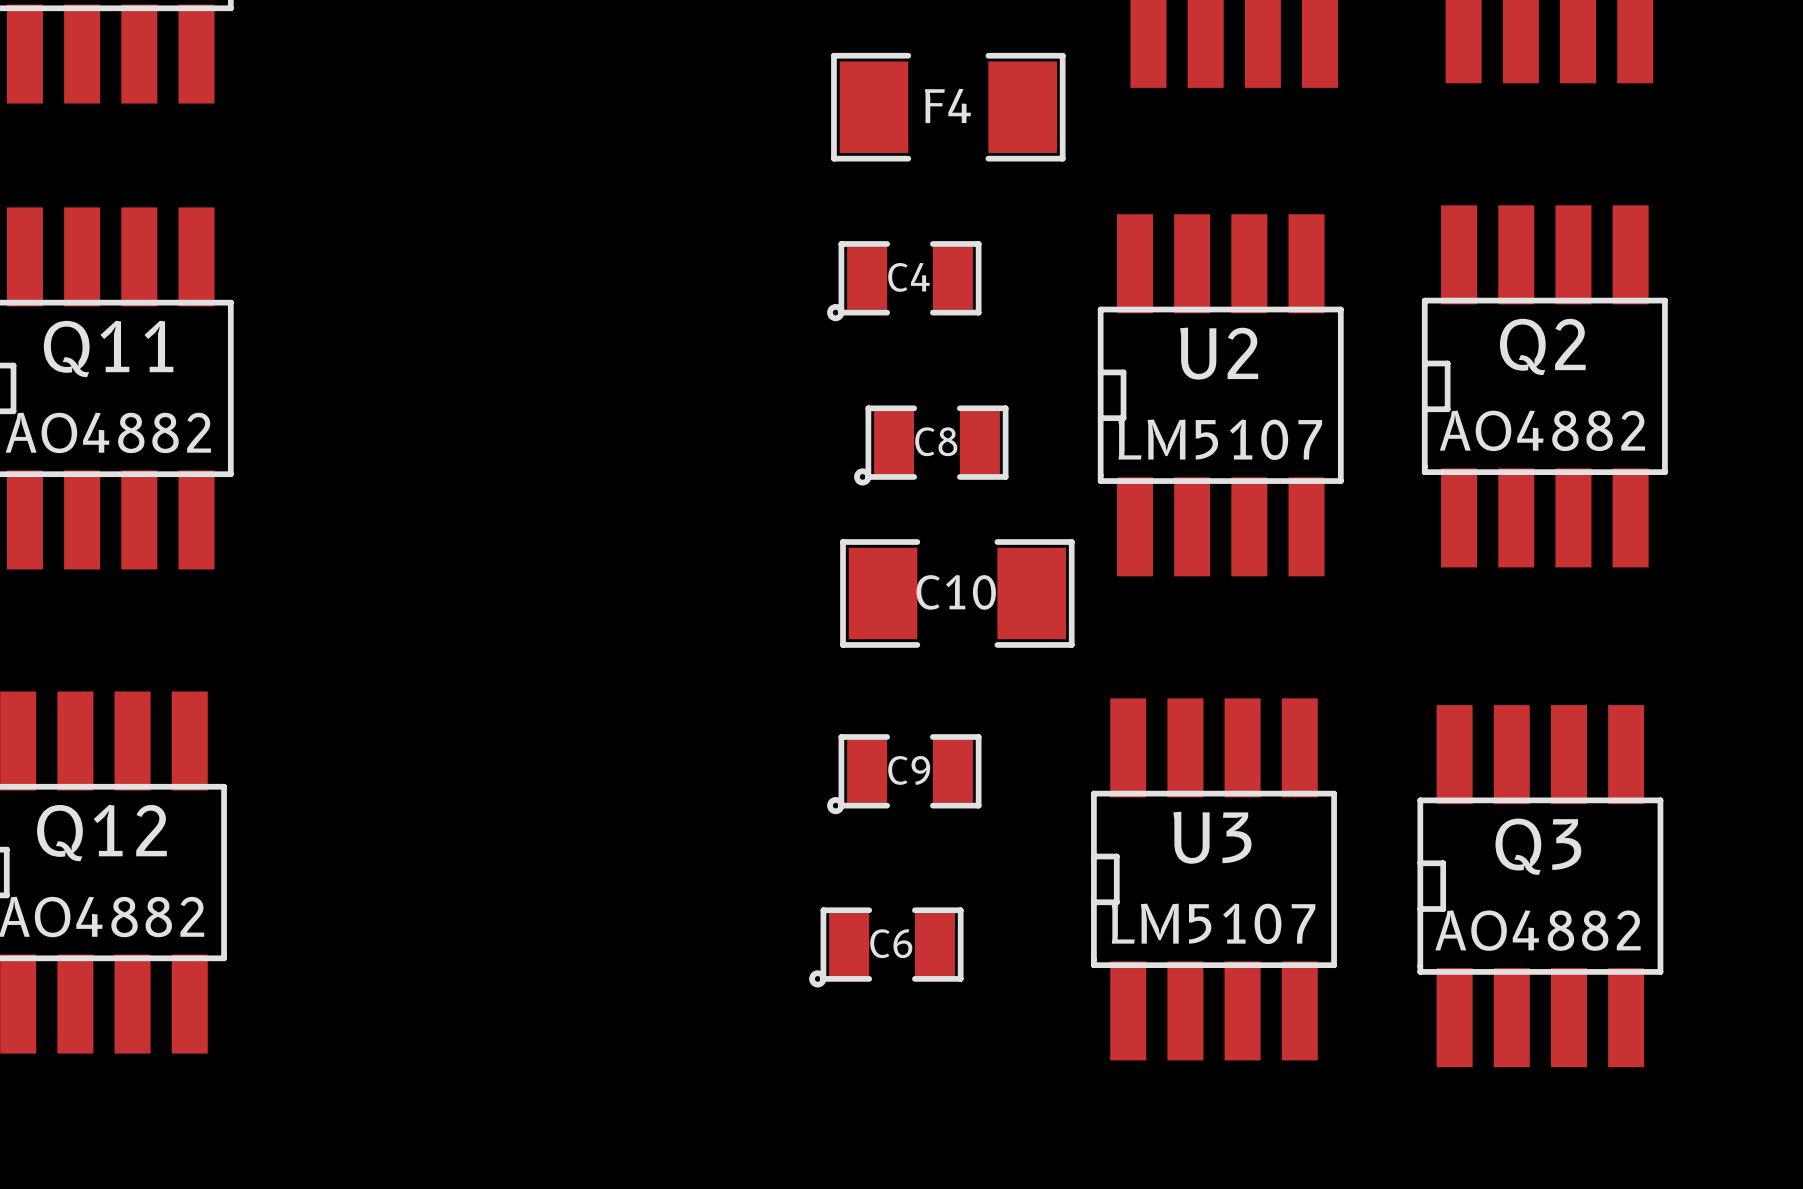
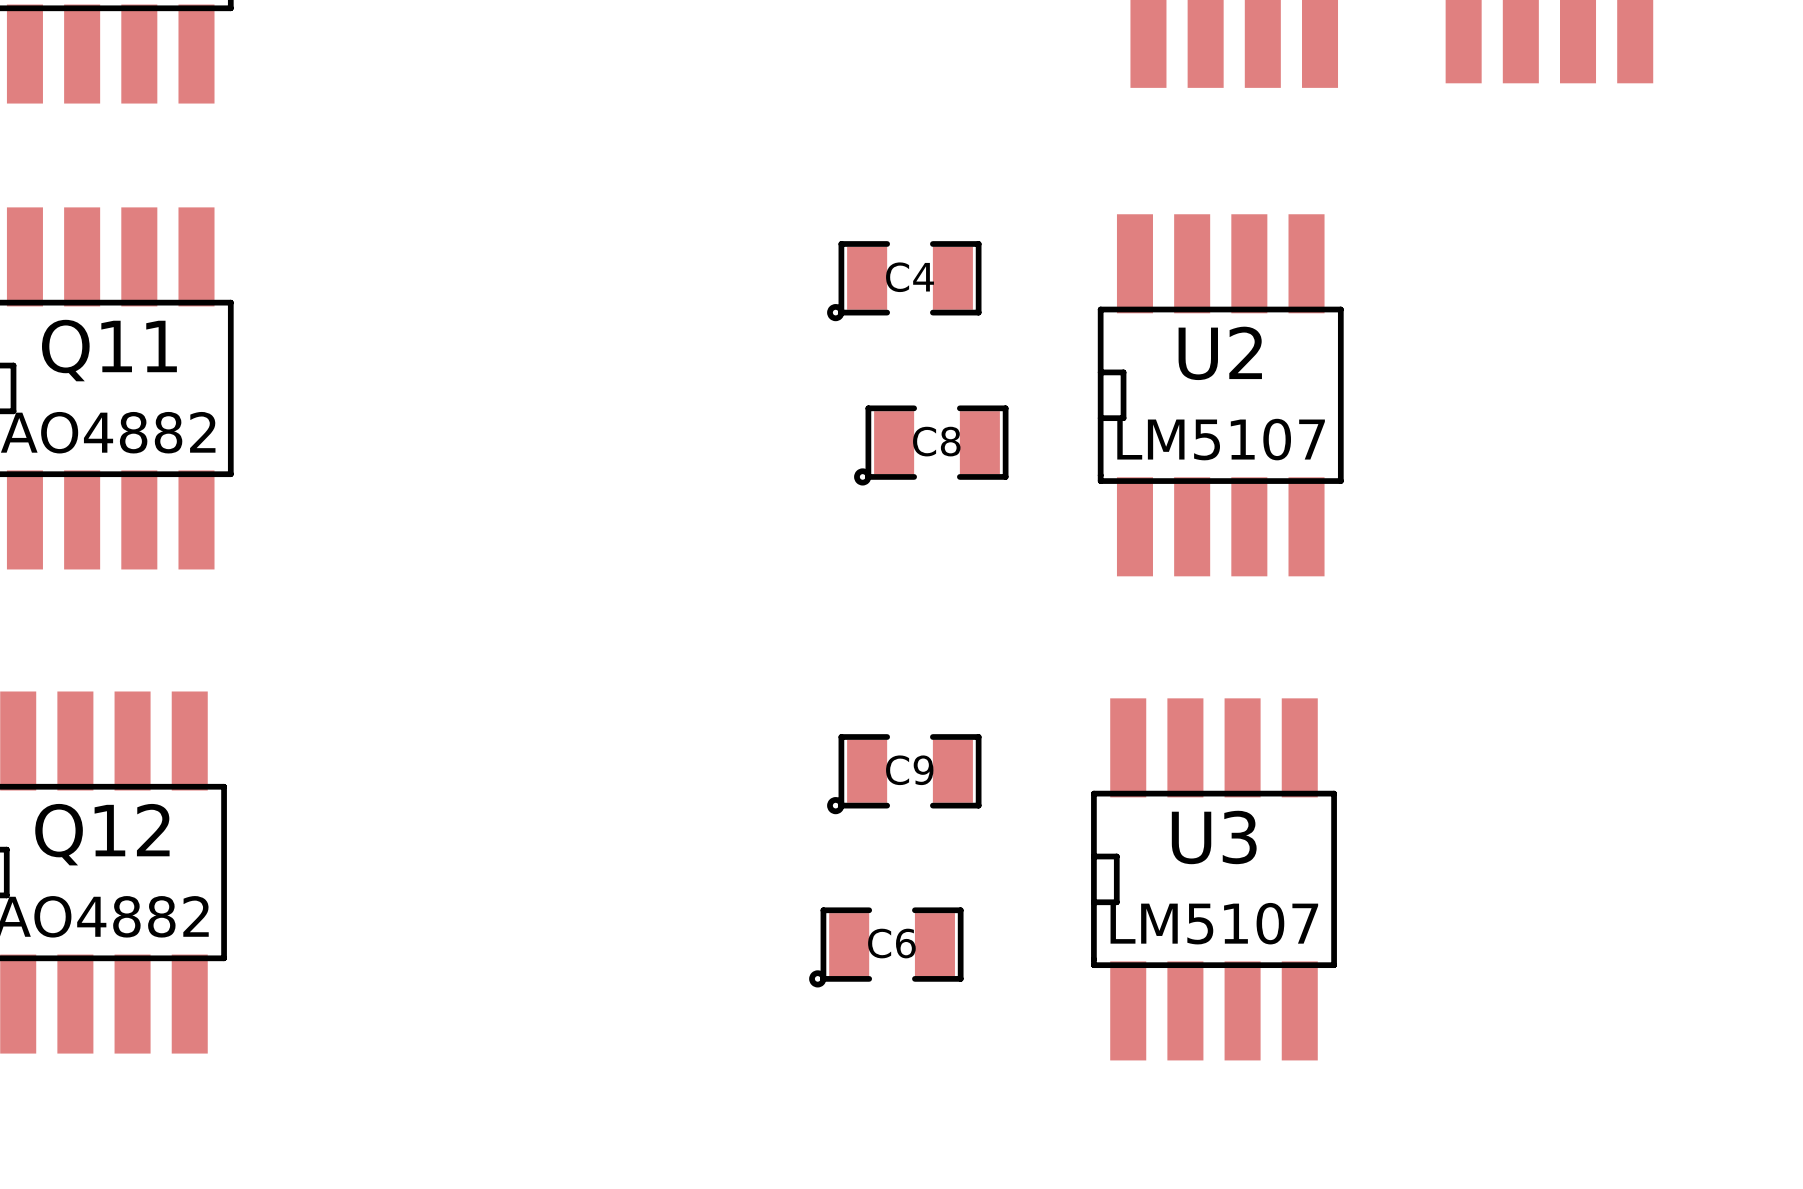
F4: (948, 107) -> none
Q2: AO4882 (1544, 386) -> none
C10: (957, 593) -> none
Q3: AO4882 (1540, 886) -> none

